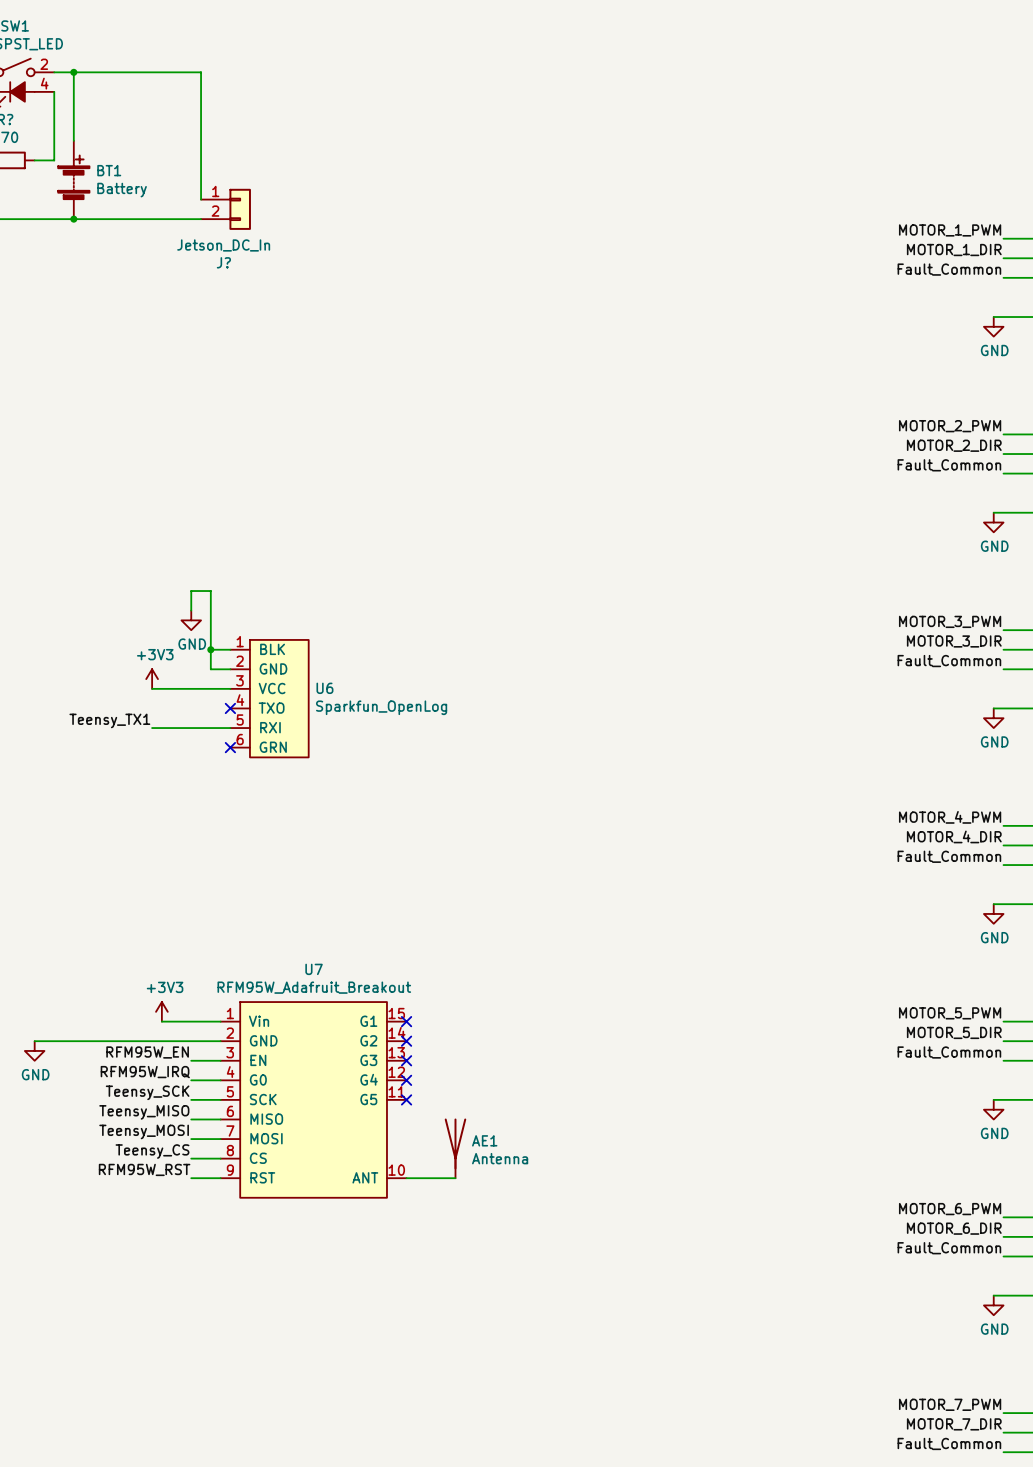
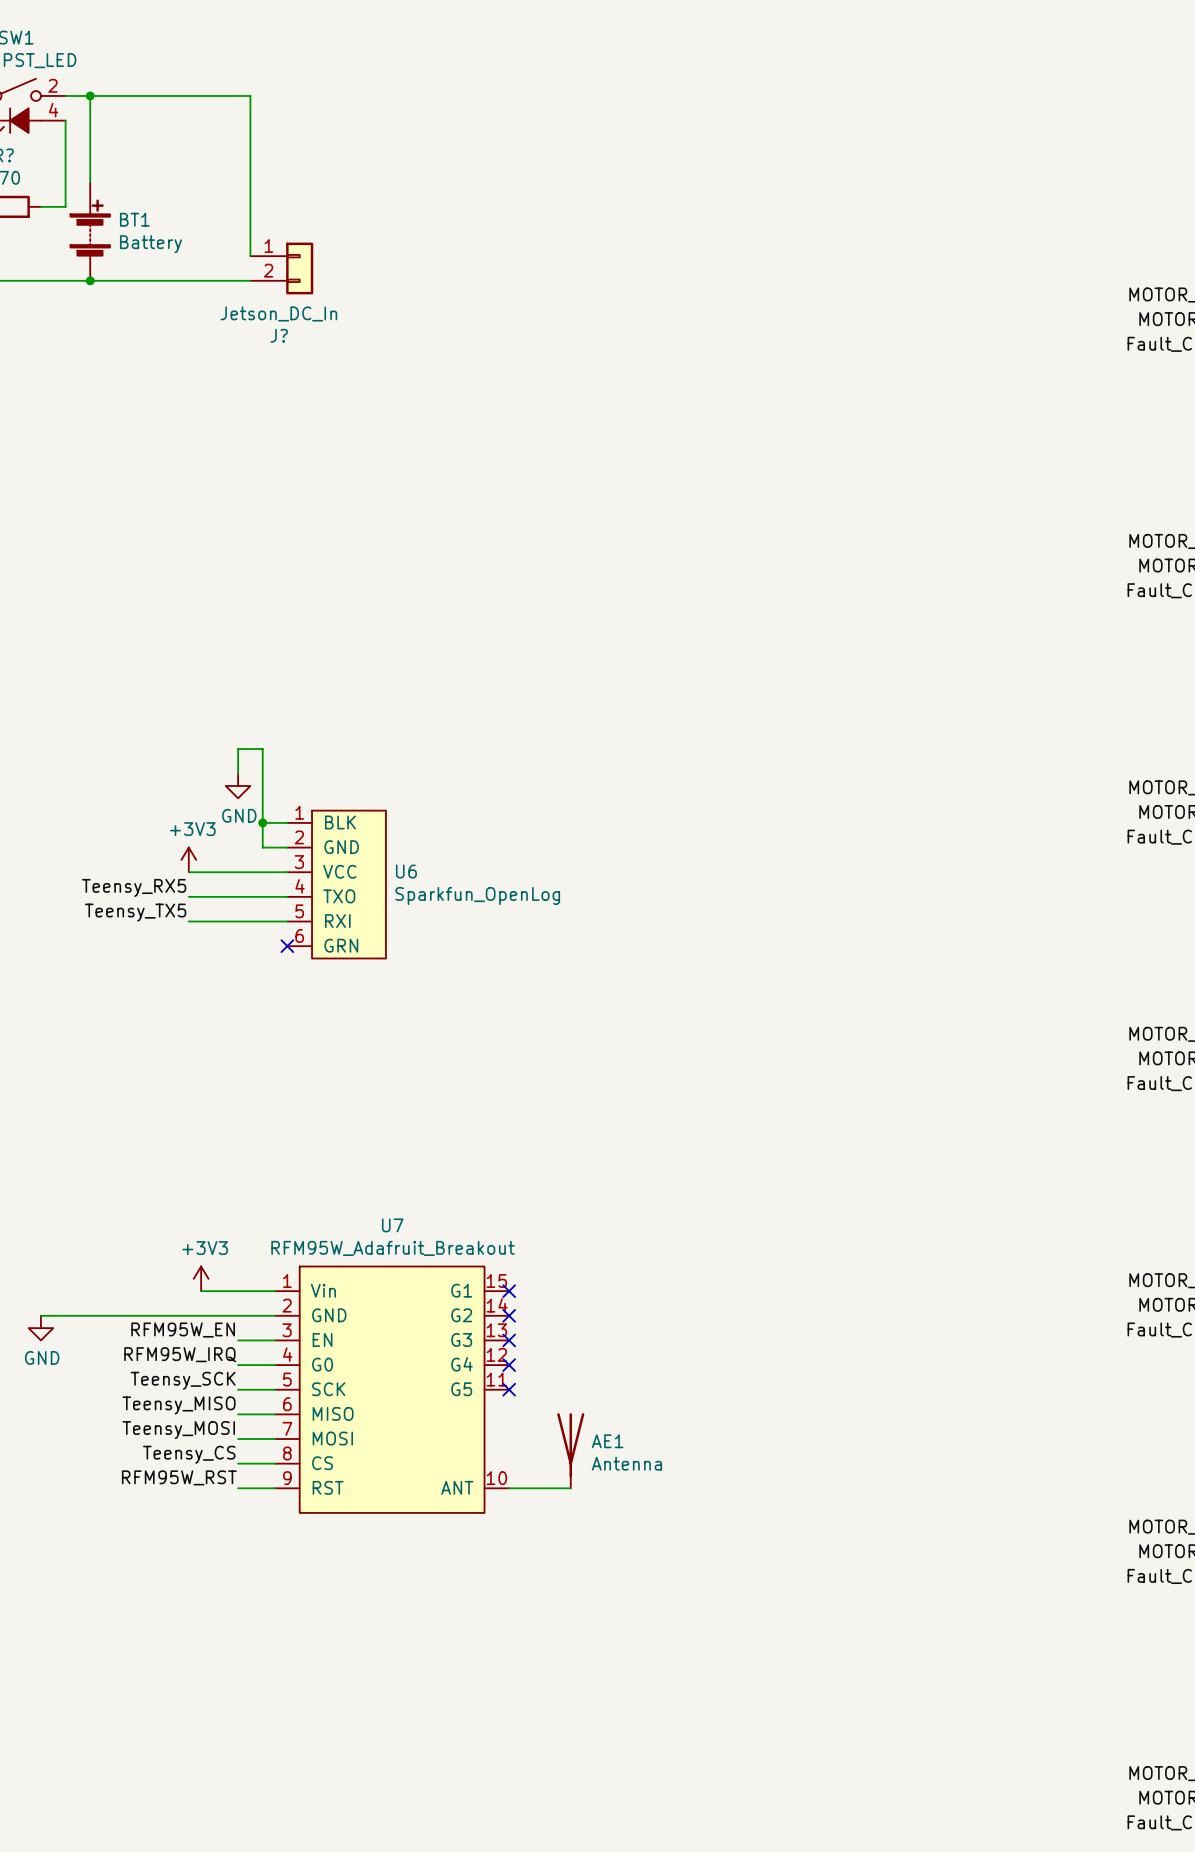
label: none -> Teensy_RX5 (134, 887)
wire: none -> (188, 896) (287, 896)
no-connect mark: (230, 708) -> none
label: Teensy_TX1 (109, 720) -> Teensy_TX5 (135, 912)

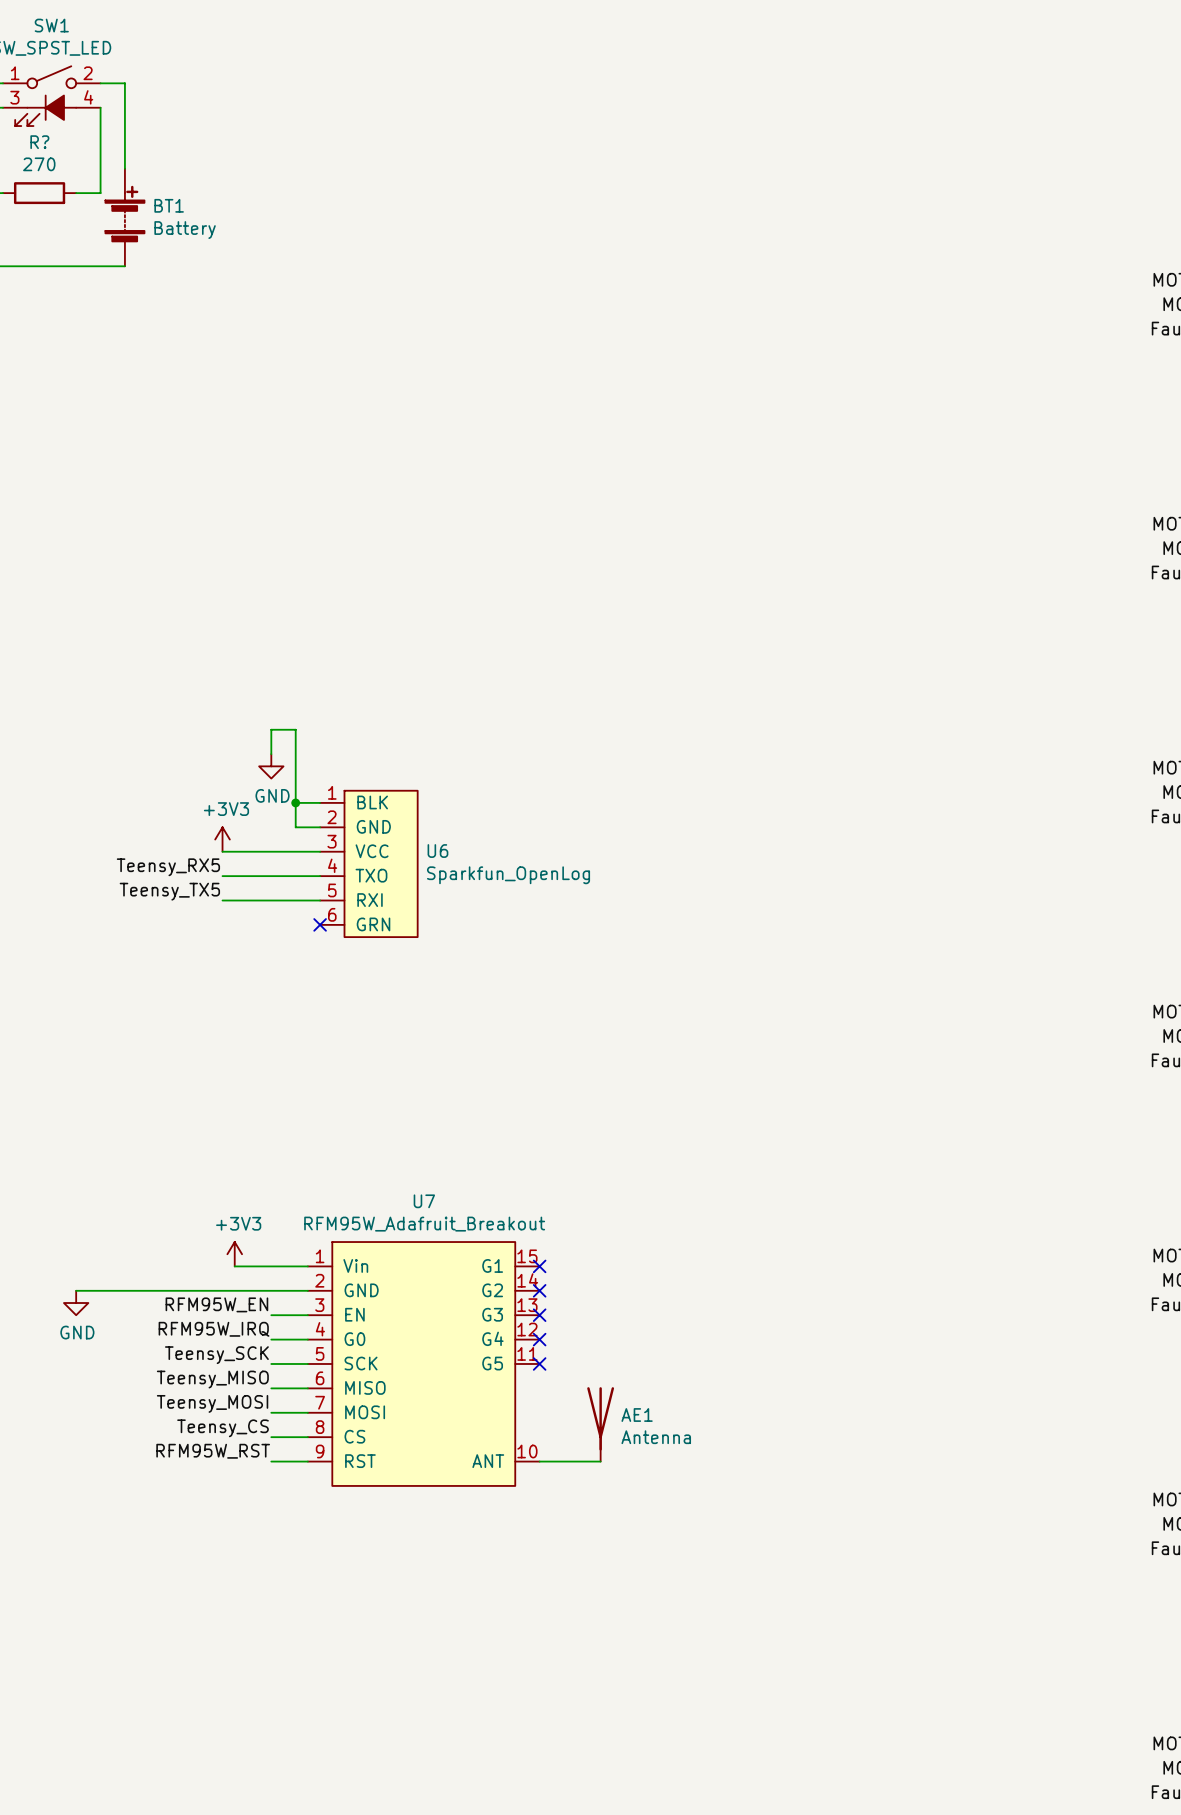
wire: (90, 95) (250, 95) (250, 256) -> none
junction: (90, 95) -> none
J?: Jetson_DC_In (281, 268) -> none
wire: (90, 280) (250, 280) -> none
junction: (90, 280) -> none

